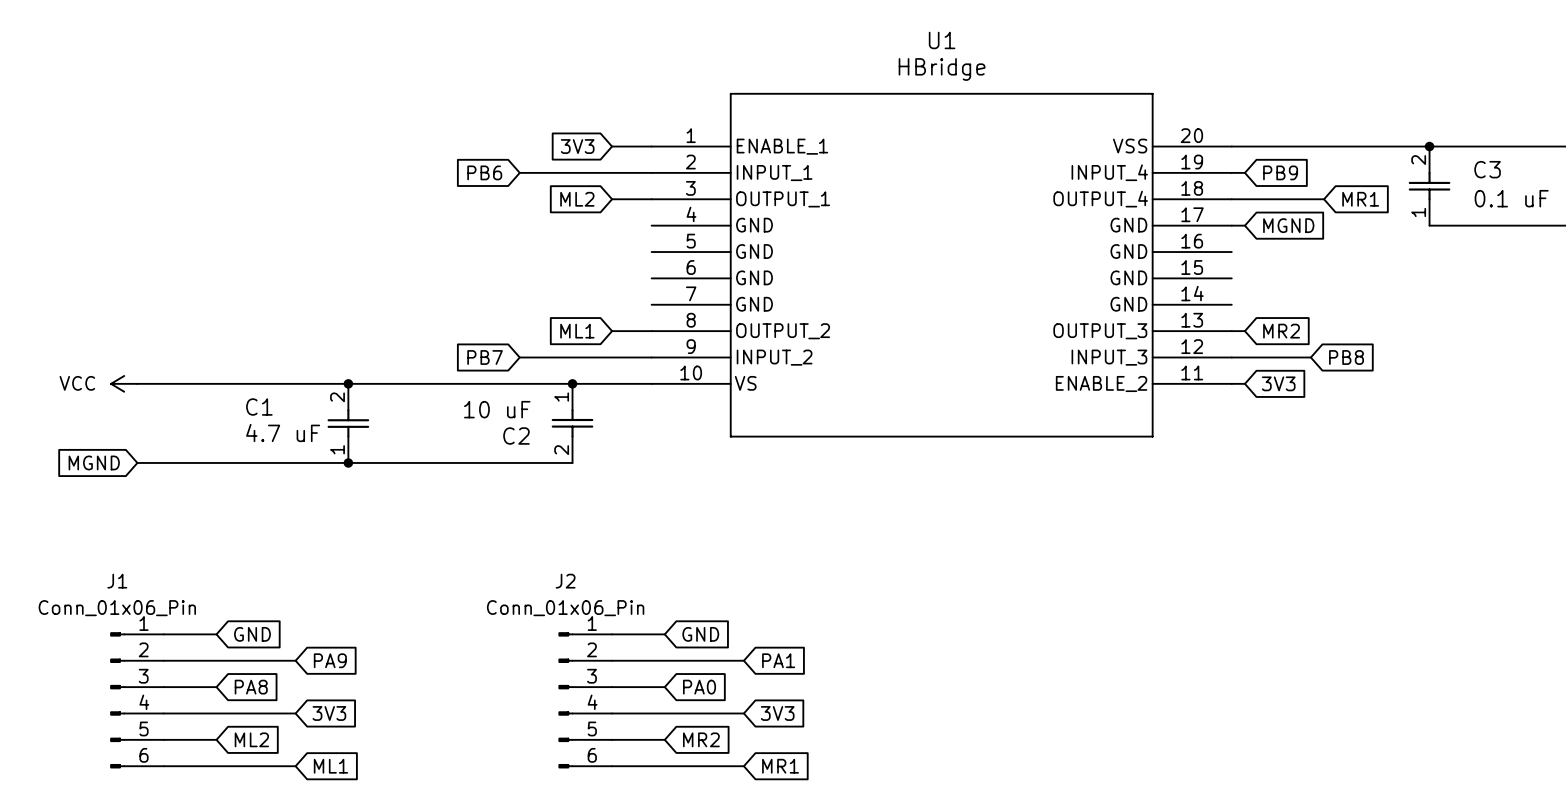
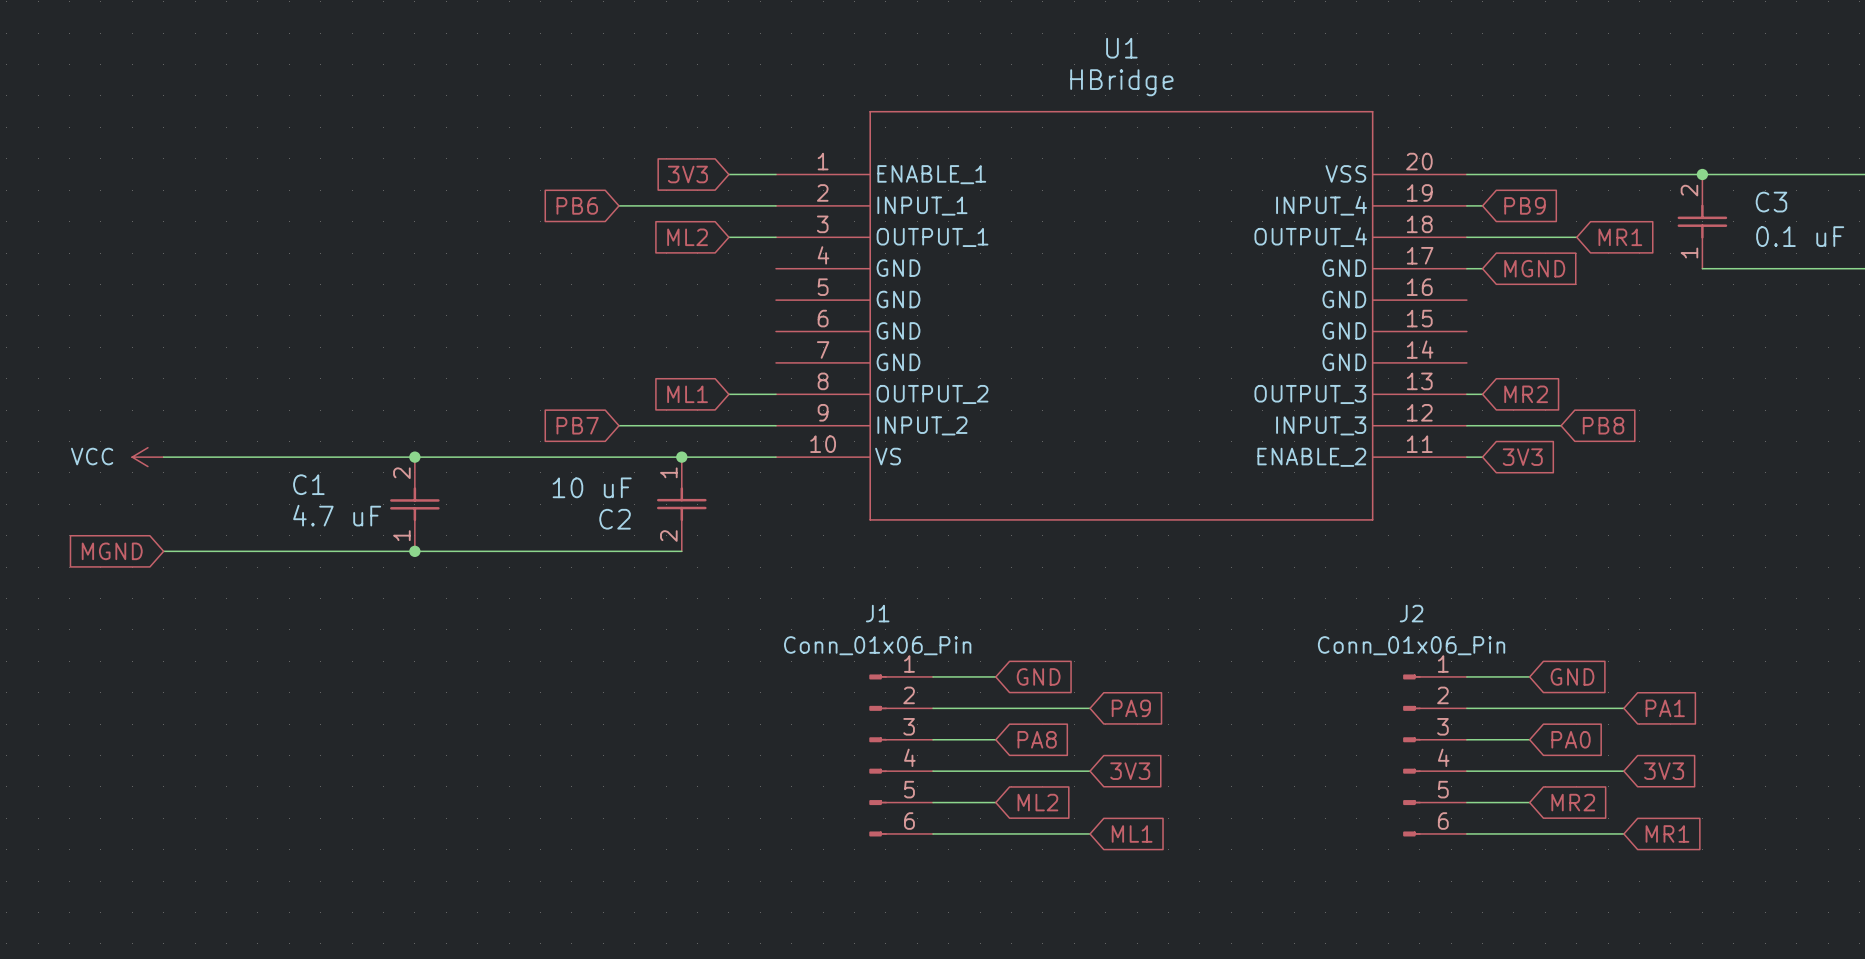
wire: none -> (1466, 676) (1529, 676)
global label: none -> GND (1572, 676)
global label: none -> PA9 (1131, 708)
wire: none -> (1466, 708) (1623, 708)
global label: none -> PA1 (1665, 708)
global label: none -> PA8 (1037, 739)
wire: none -> (1466, 739) (1529, 739)
global label: none -> PA0 (1571, 739)
wire: (163, 634) (216, 634) -> none
global label: GND (252, 634) -> none
wire: (612, 634) (664, 634) -> (933, 676) (995, 676)
global label position: GND (700, 634) -> GND (1038, 676)
wire: none -> (1466, 771) (1623, 771)
global label: none -> 3V3 (1664, 771)
wire: (163, 660) (295, 660) -> none
global label: PA9 (330, 660) -> none
wire: (612, 660) (743, 660) -> (933, 708) (1090, 708)
global label: PA1 (778, 660) -> none
global label: none -> ML2 (1037, 802)
wire: none -> (1466, 802) (1529, 802)
global label: none -> MR2 (1573, 802)
wire: (163, 687) (216, 687) -> none
global label: PA8 (251, 687) -> none
wire: (612, 687) (664, 687) -> (933, 739) (995, 739)
global label: PA0 (699, 687) -> none
J1 position: (137, 700) -> (901, 755)
J2 position: (585, 700) -> (1435, 755)
global label: none -> ML1 (1132, 833)
wire: none -> (1466, 833) (1623, 833)
global label: none -> MR1 (1667, 833)
wire: (163, 713) (295, 713) -> none
global label: 3V3 (329, 713) -> none
wire: (612, 713) (743, 713) -> (933, 771) (1090, 771)
global label position: 3V3 (777, 713) -> 3V3 (1130, 771)
wire: (163, 739) (216, 739) -> none
global label: ML2 (251, 739) -> none
wire: (612, 739) (664, 739) -> (933, 802) (995, 802)
global label: MR2 (701, 739) -> none
wire: (163, 766) (295, 766) -> none
global label: ML1 (330, 766) -> none
wire: (612, 766) (743, 766) -> (933, 833) (1090, 833)
global label: MR1 (780, 766) -> none

